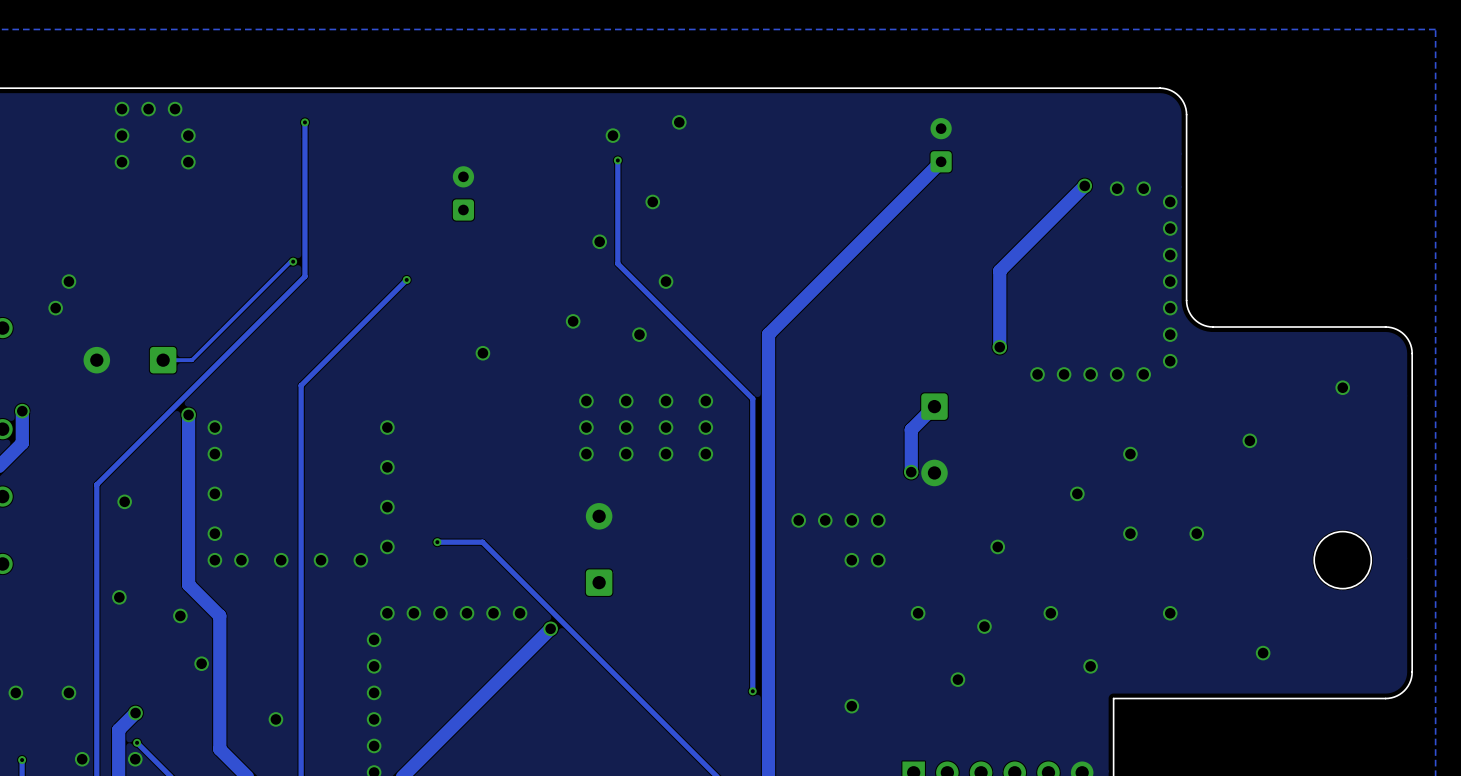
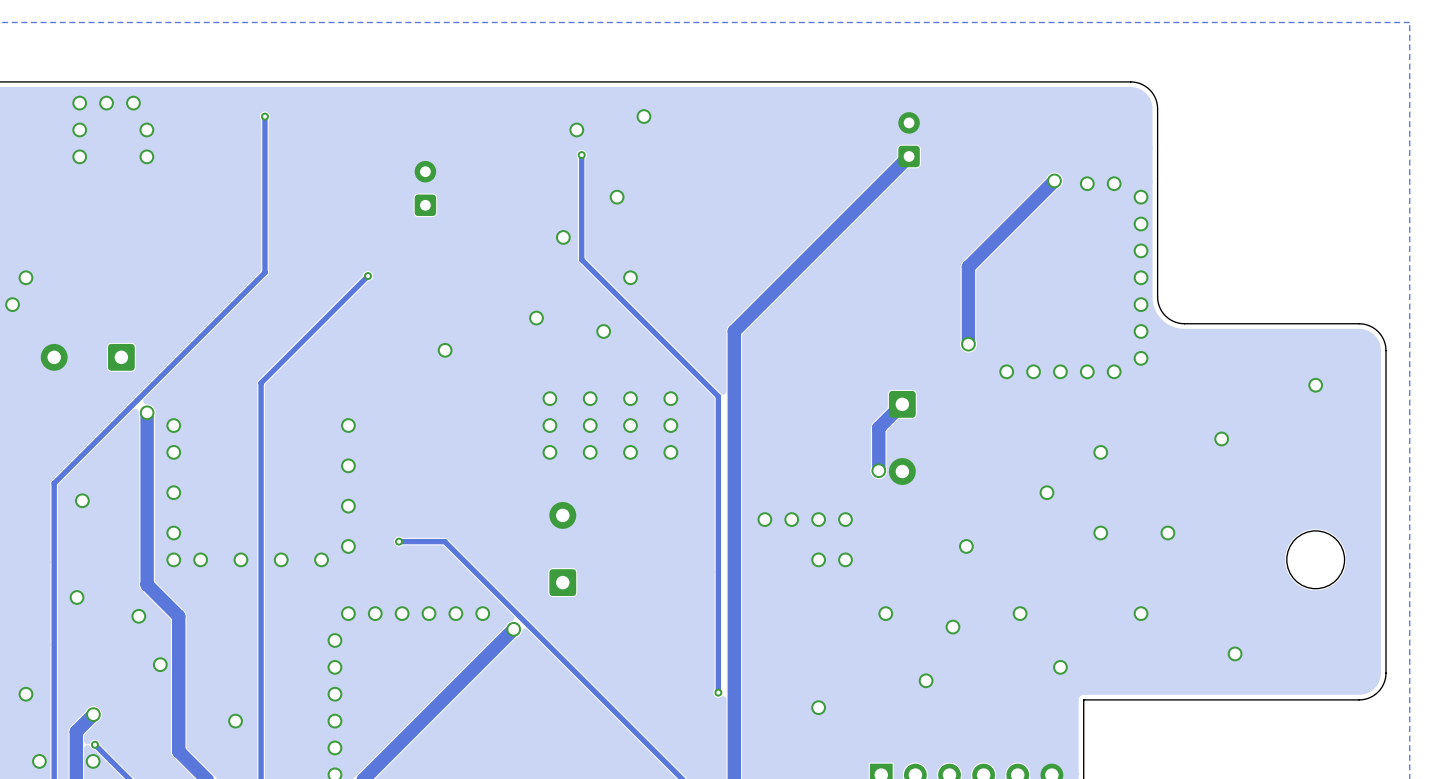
track: (293, 261) (290, 261) (192, 360) (163, 360) -> none
via: (293, 261) -> none

